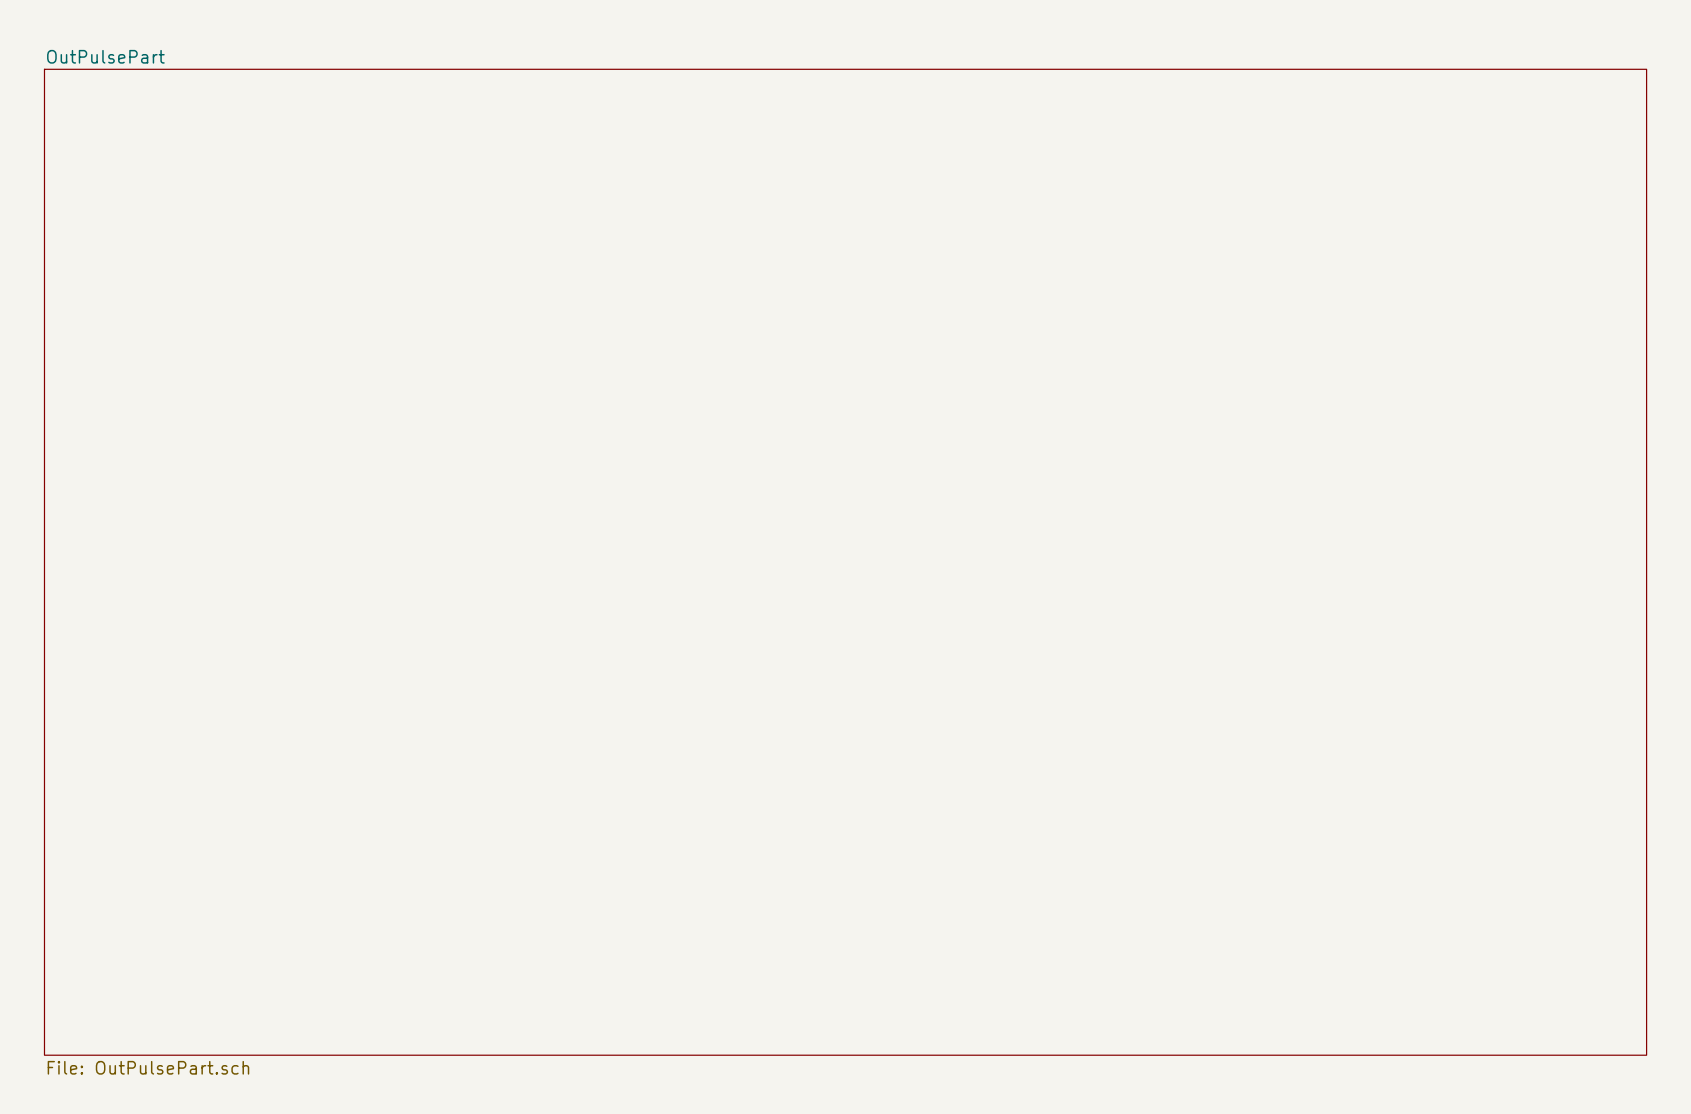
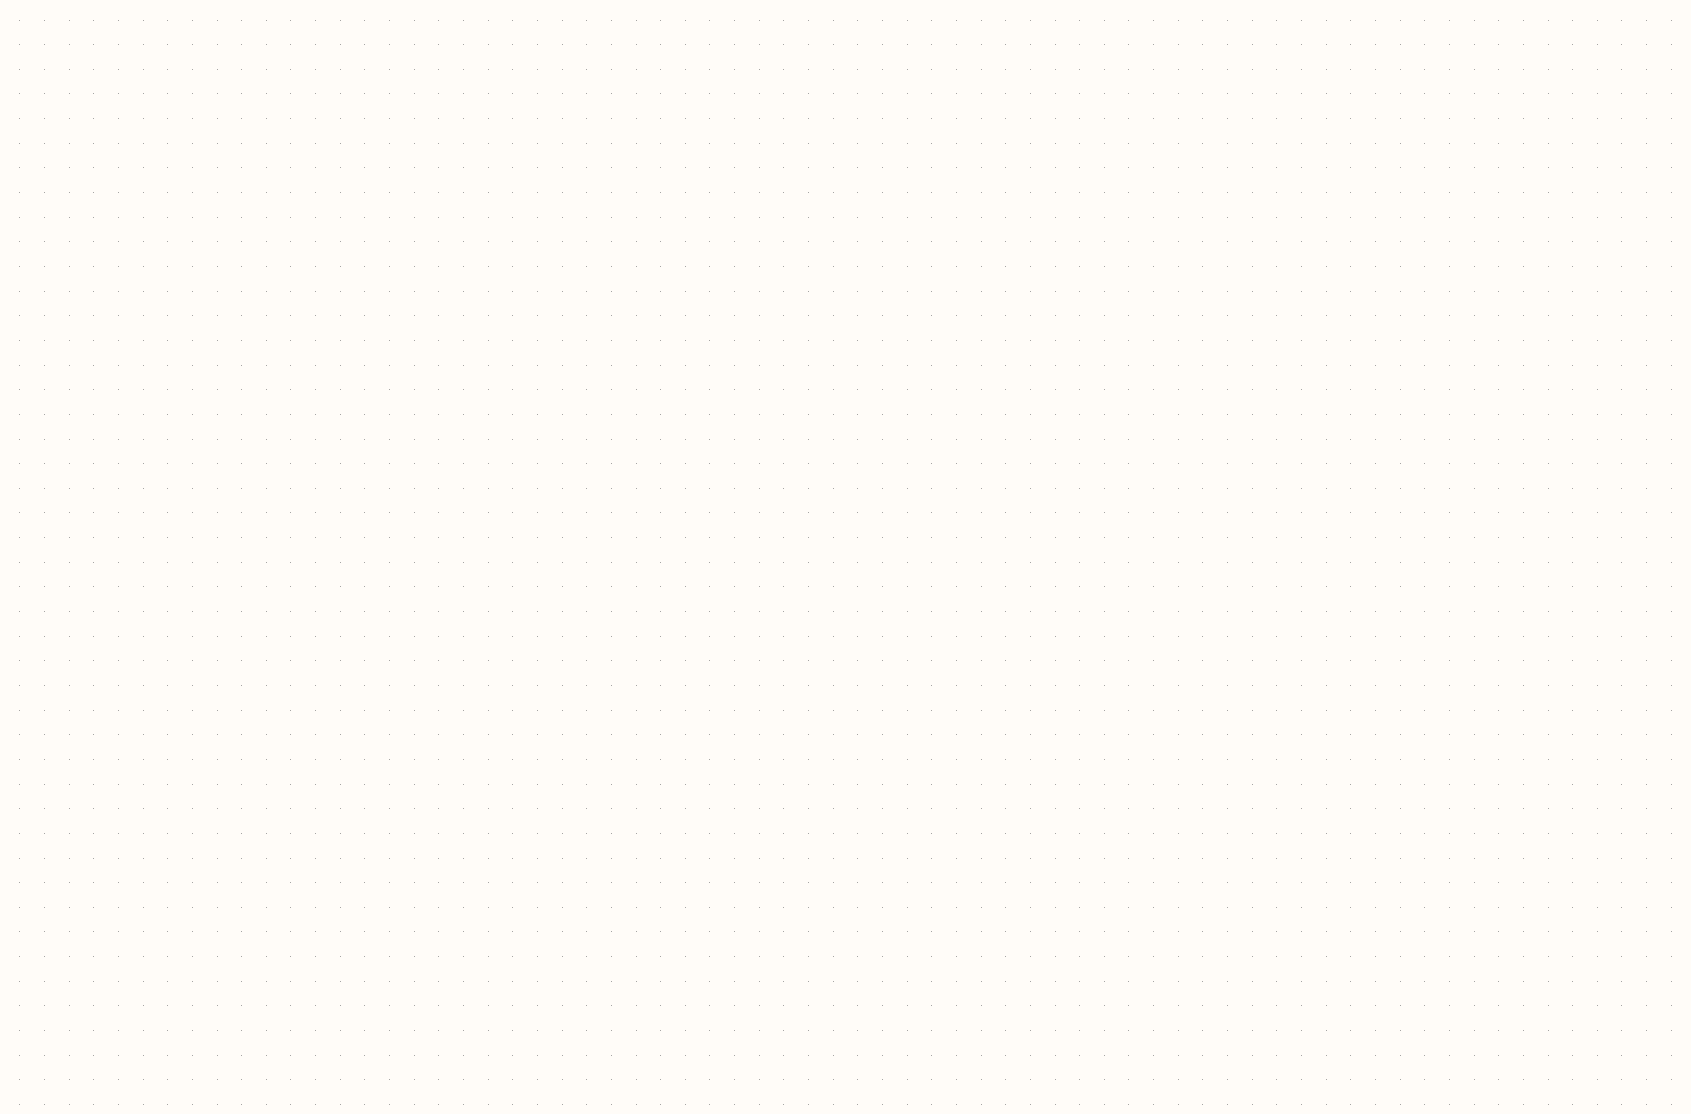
sheet OutPulsePart: File: OutPulsePart.sch (845, 562) -> none

